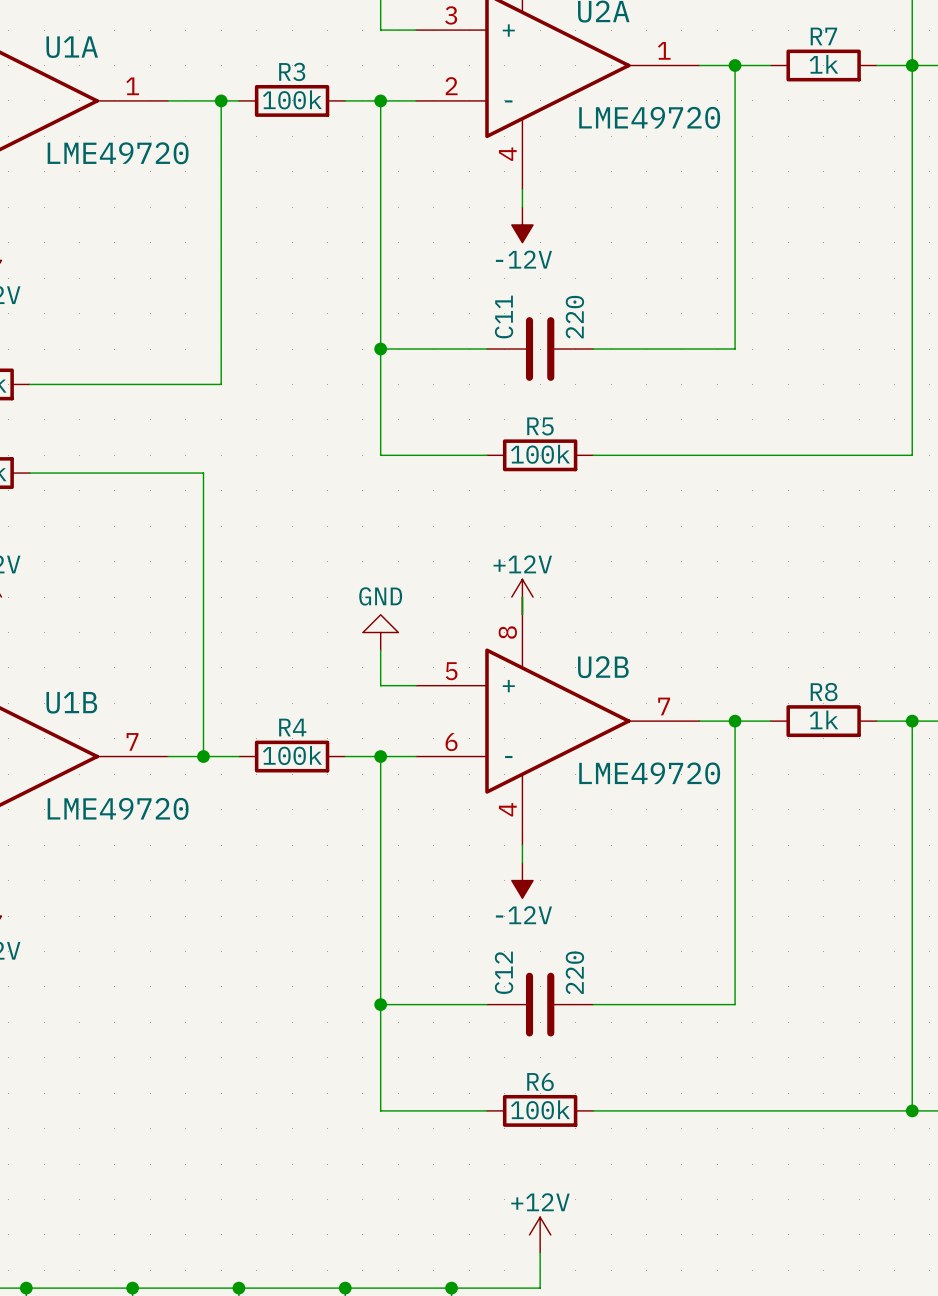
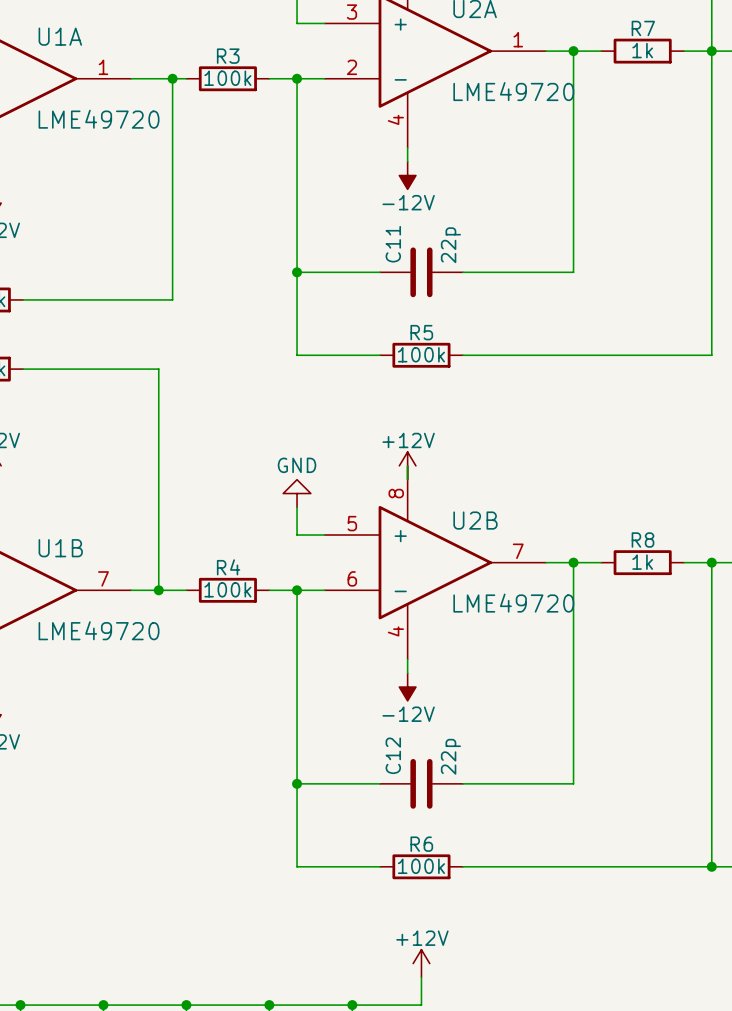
C11 value: 220 (574, 317) -> 22p (450, 245)
C12 value: 220 (574, 972) -> 22p (450, 756)

